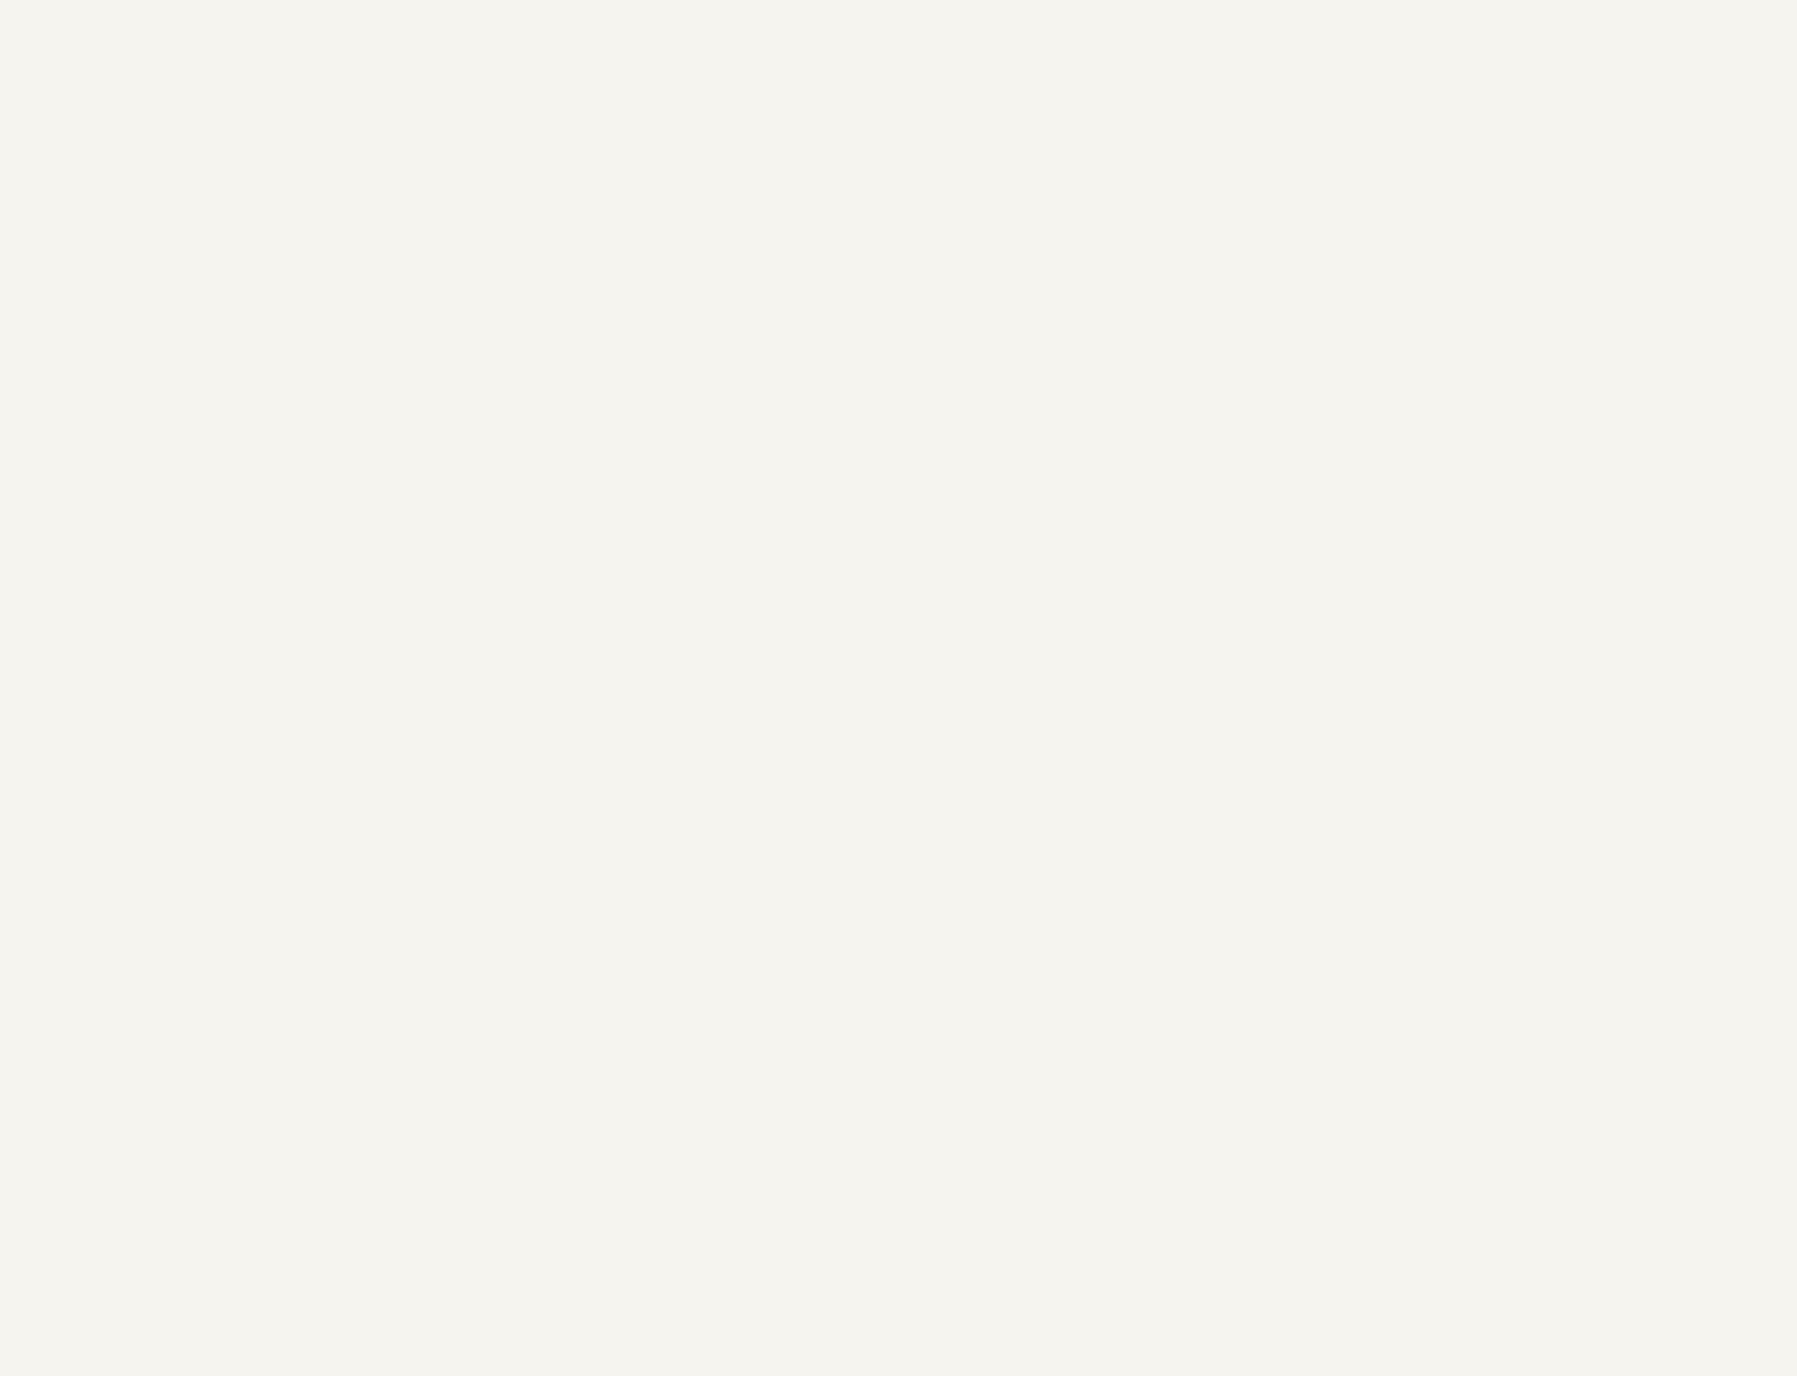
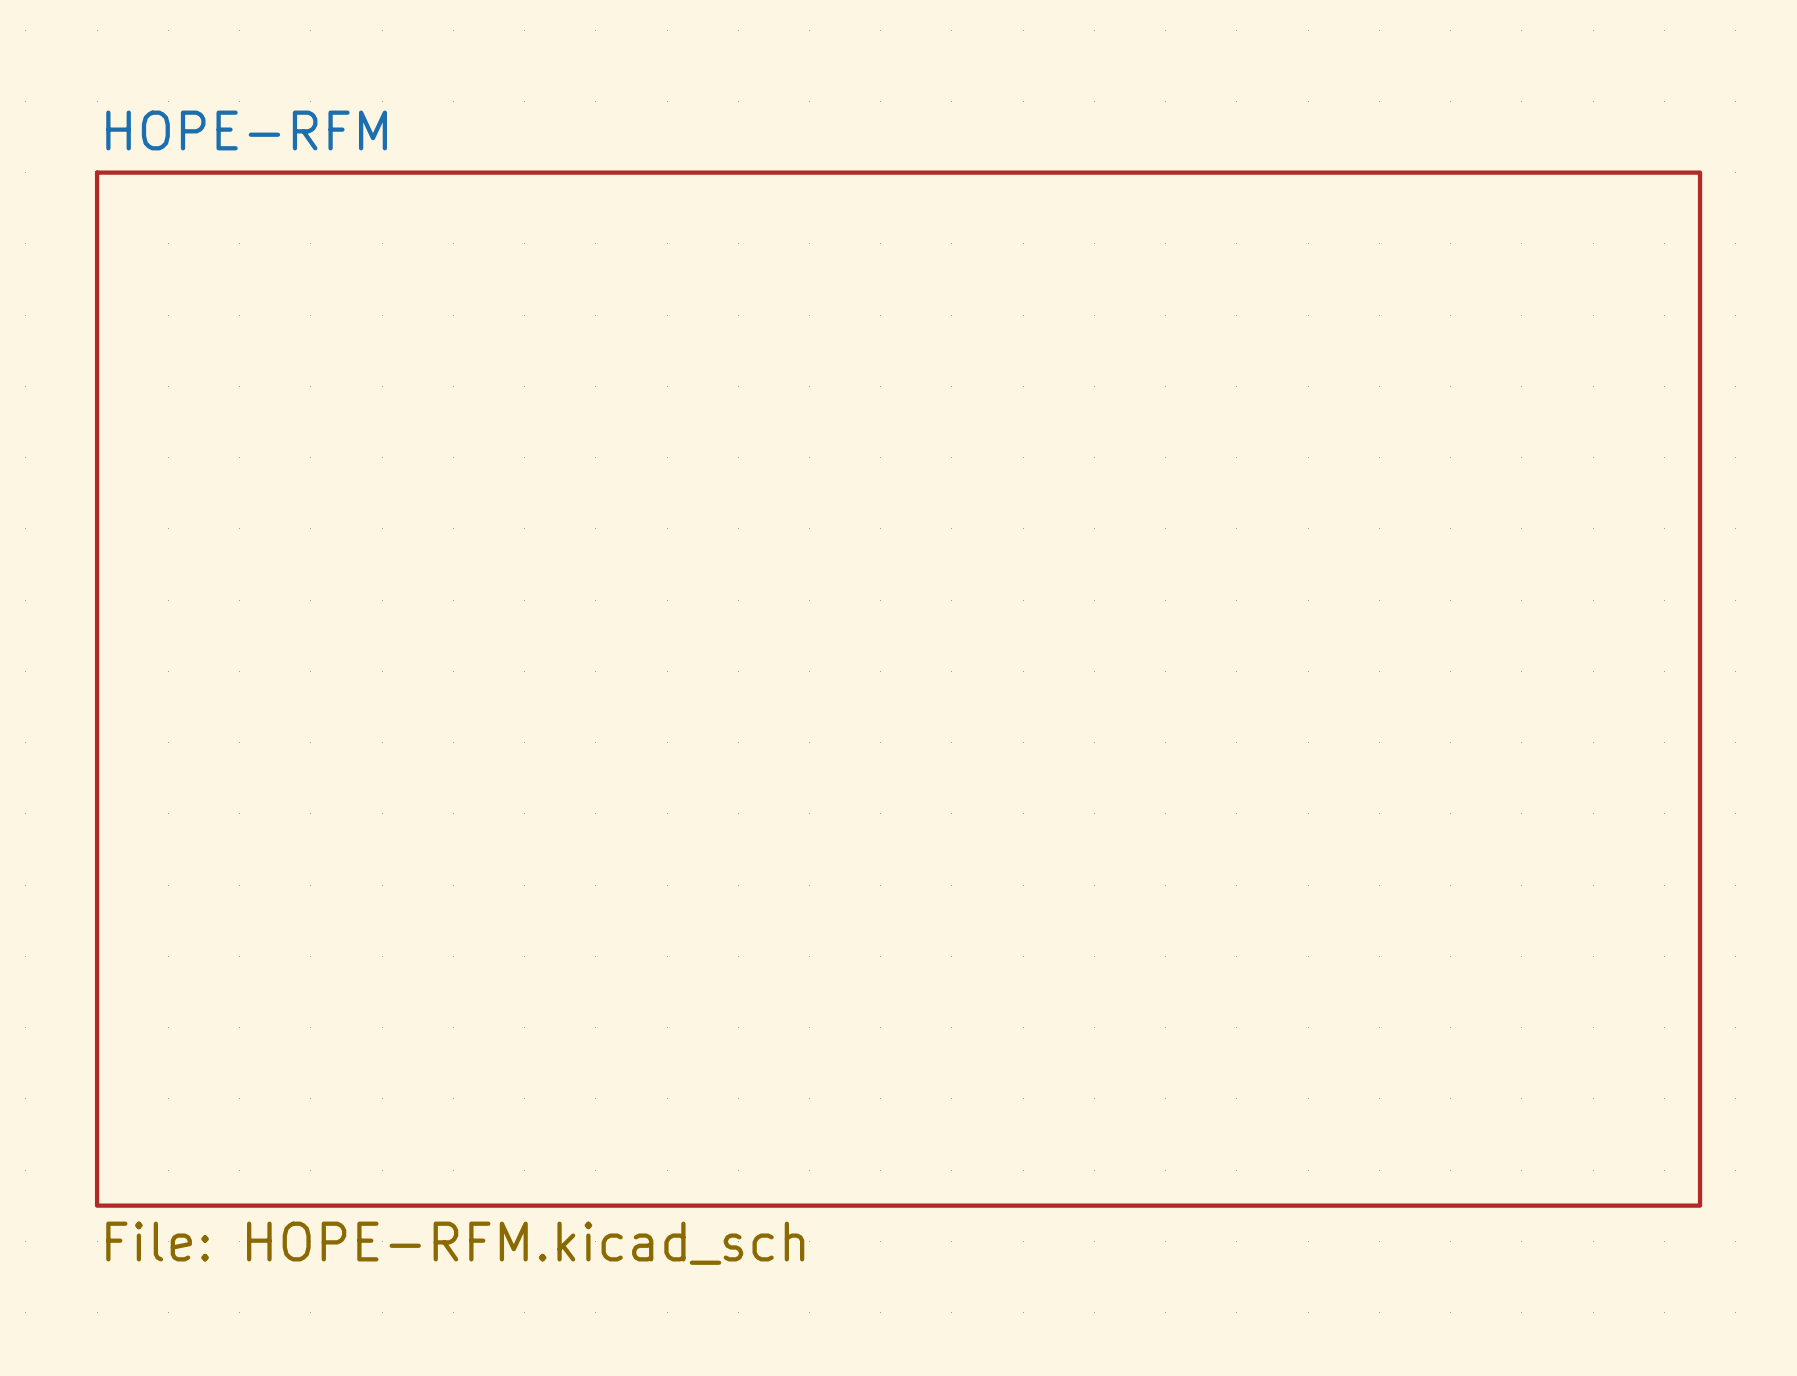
sheet HOPE-RFM: none -> File: HOPE-RFM.kicad_sch (898, 689)

